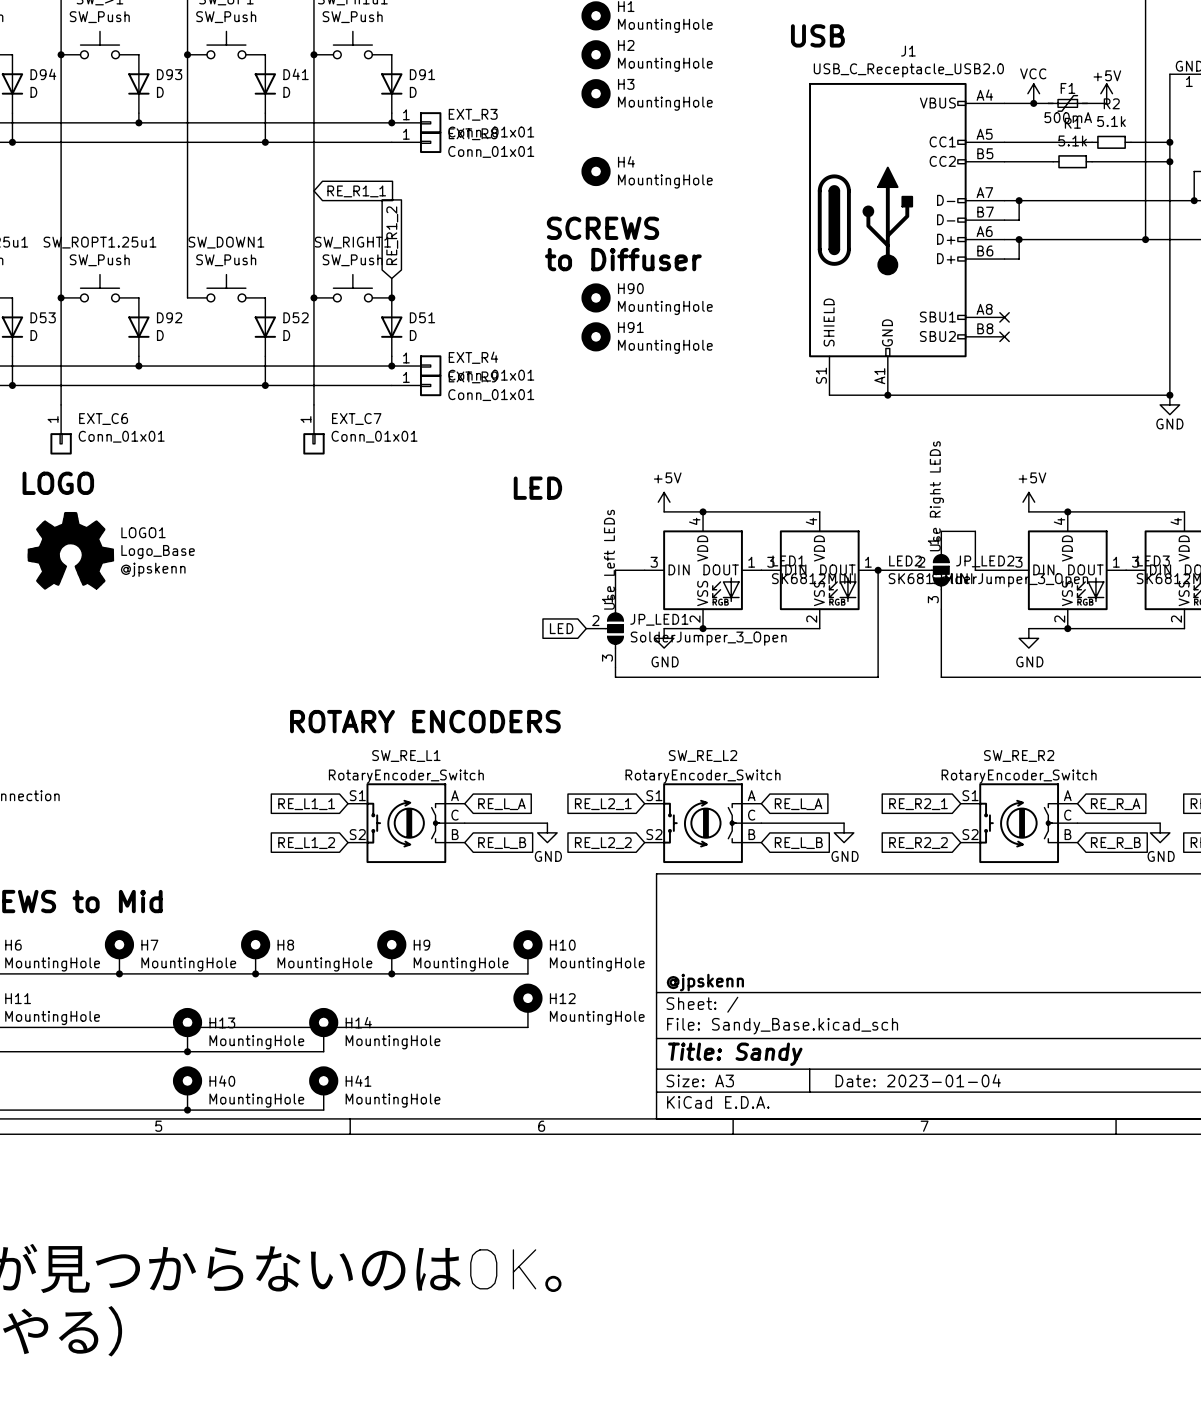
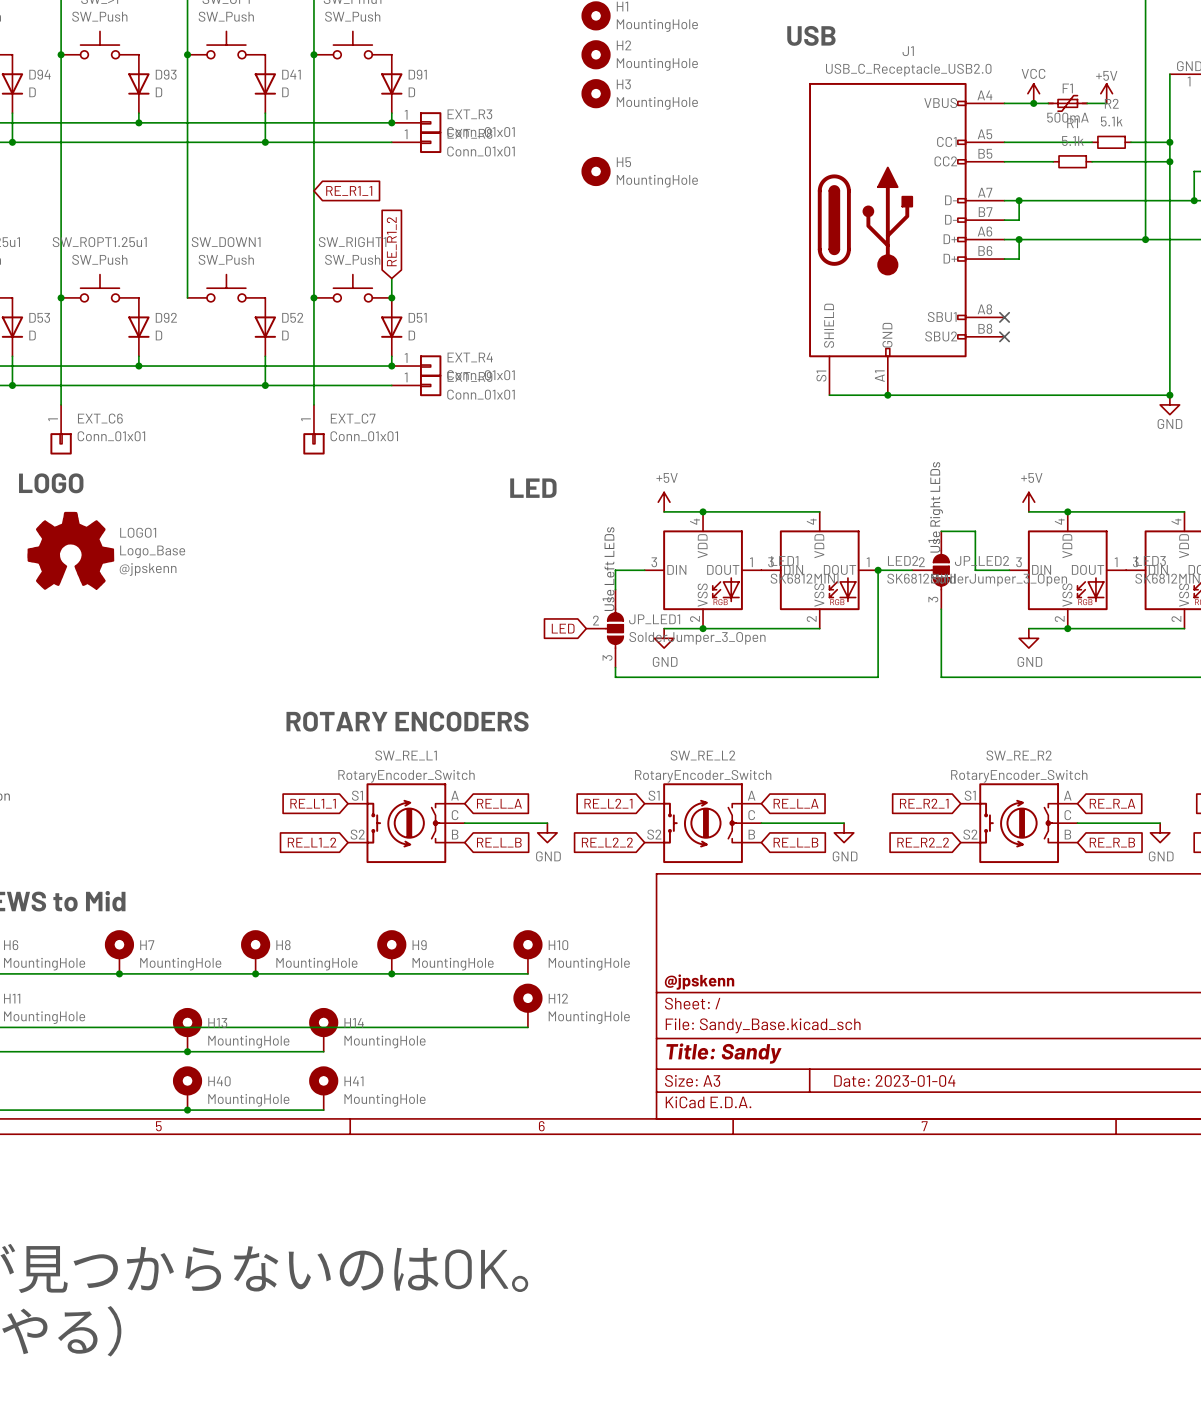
H4 name: H4 (626, 161) -> H5 (623, 162)
text: SCREWS (603, 228) -> none
text: to Diffuser (623, 259) -> none
H90: MountingHole (596, 297) -> none
H91: MountingHole (596, 336) -> none

